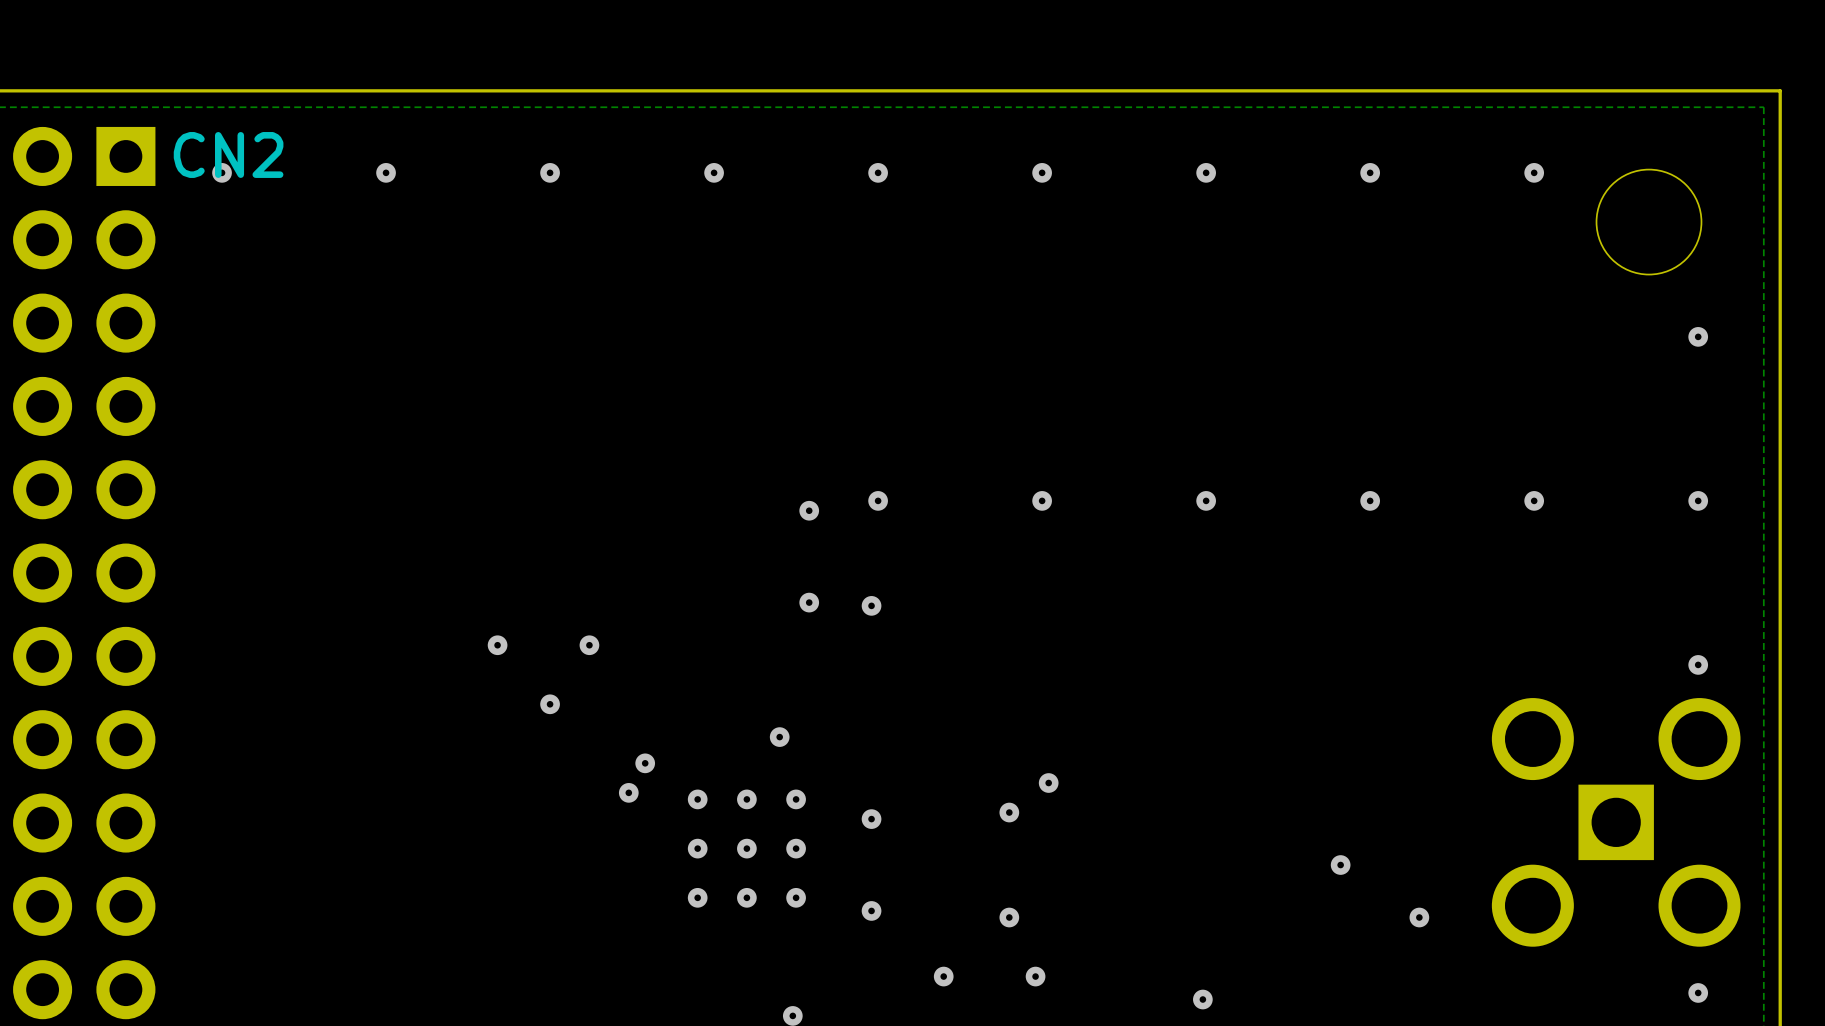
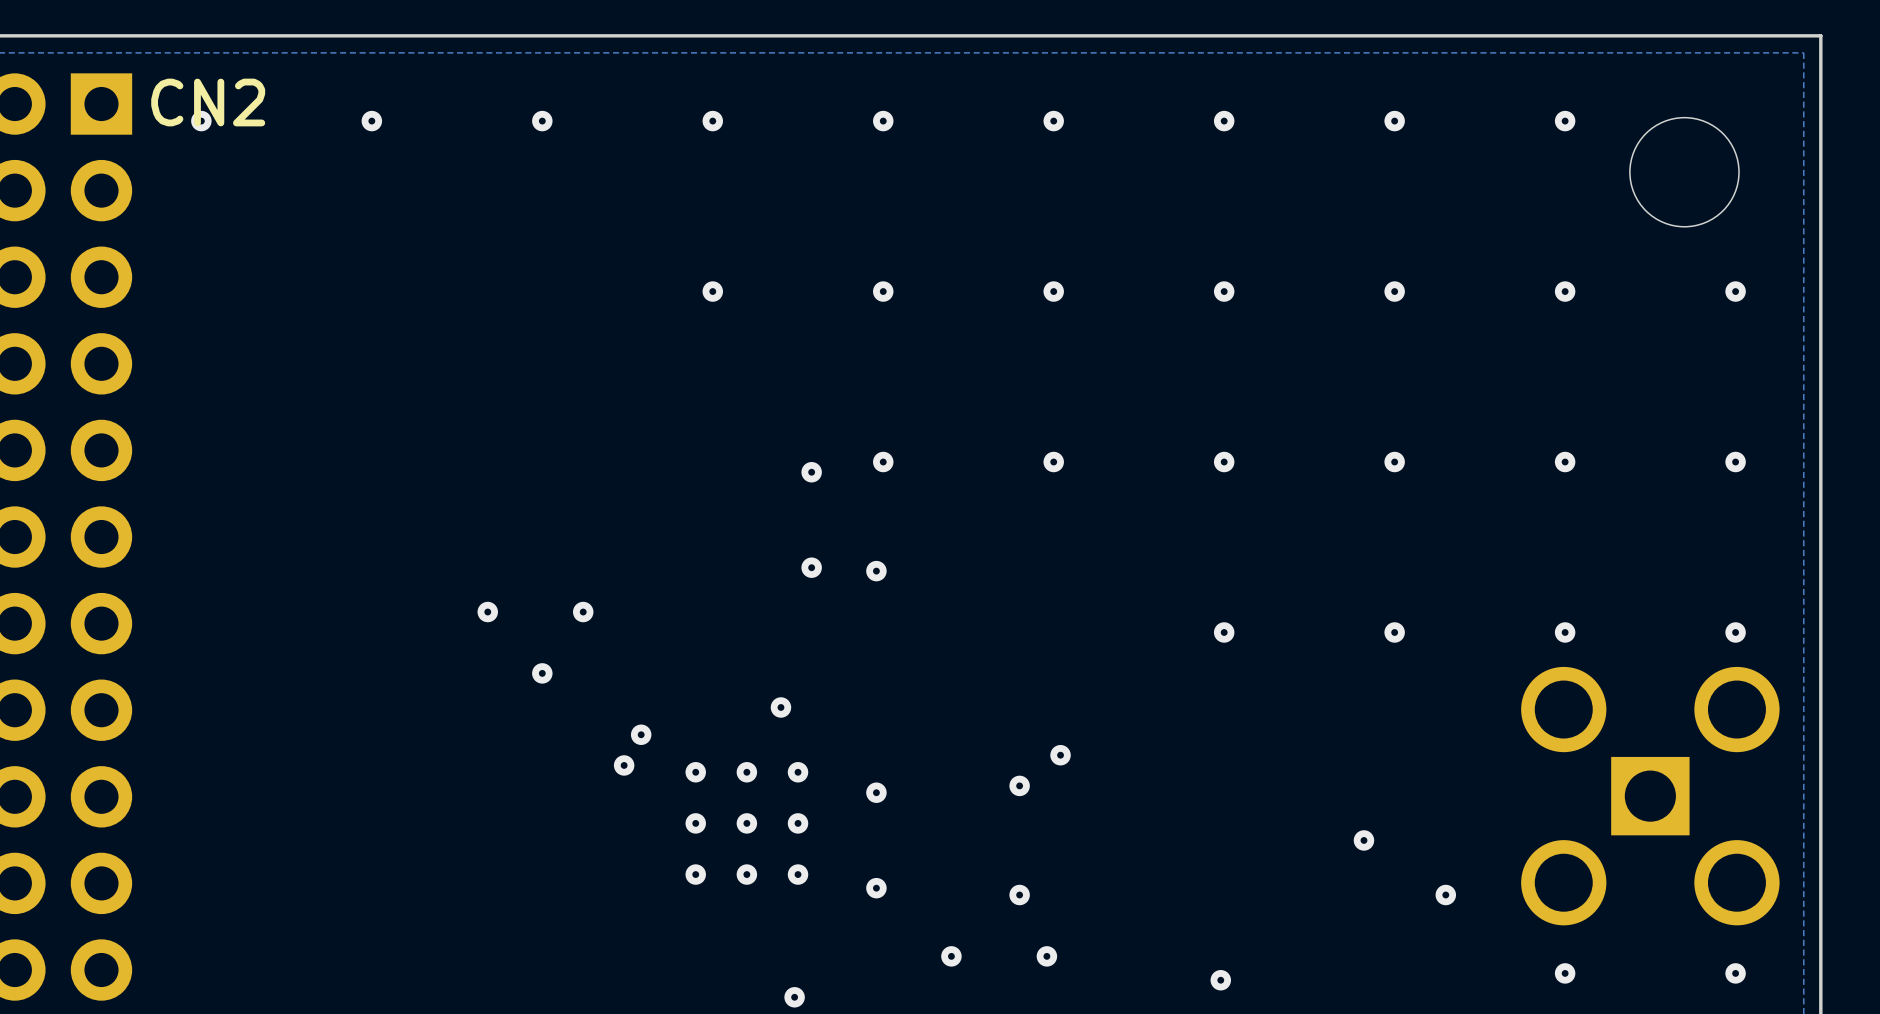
via: none -> (712, 291)
via: none -> (883, 291)
via: none -> (1053, 291)
via: none -> (1224, 291)
via: none -> (1394, 291)
via: none -> (1565, 291)
via: none -> (1224, 632)
via: none -> (1394, 632)
via: none -> (1565, 632)
via: none -> (1565, 973)

